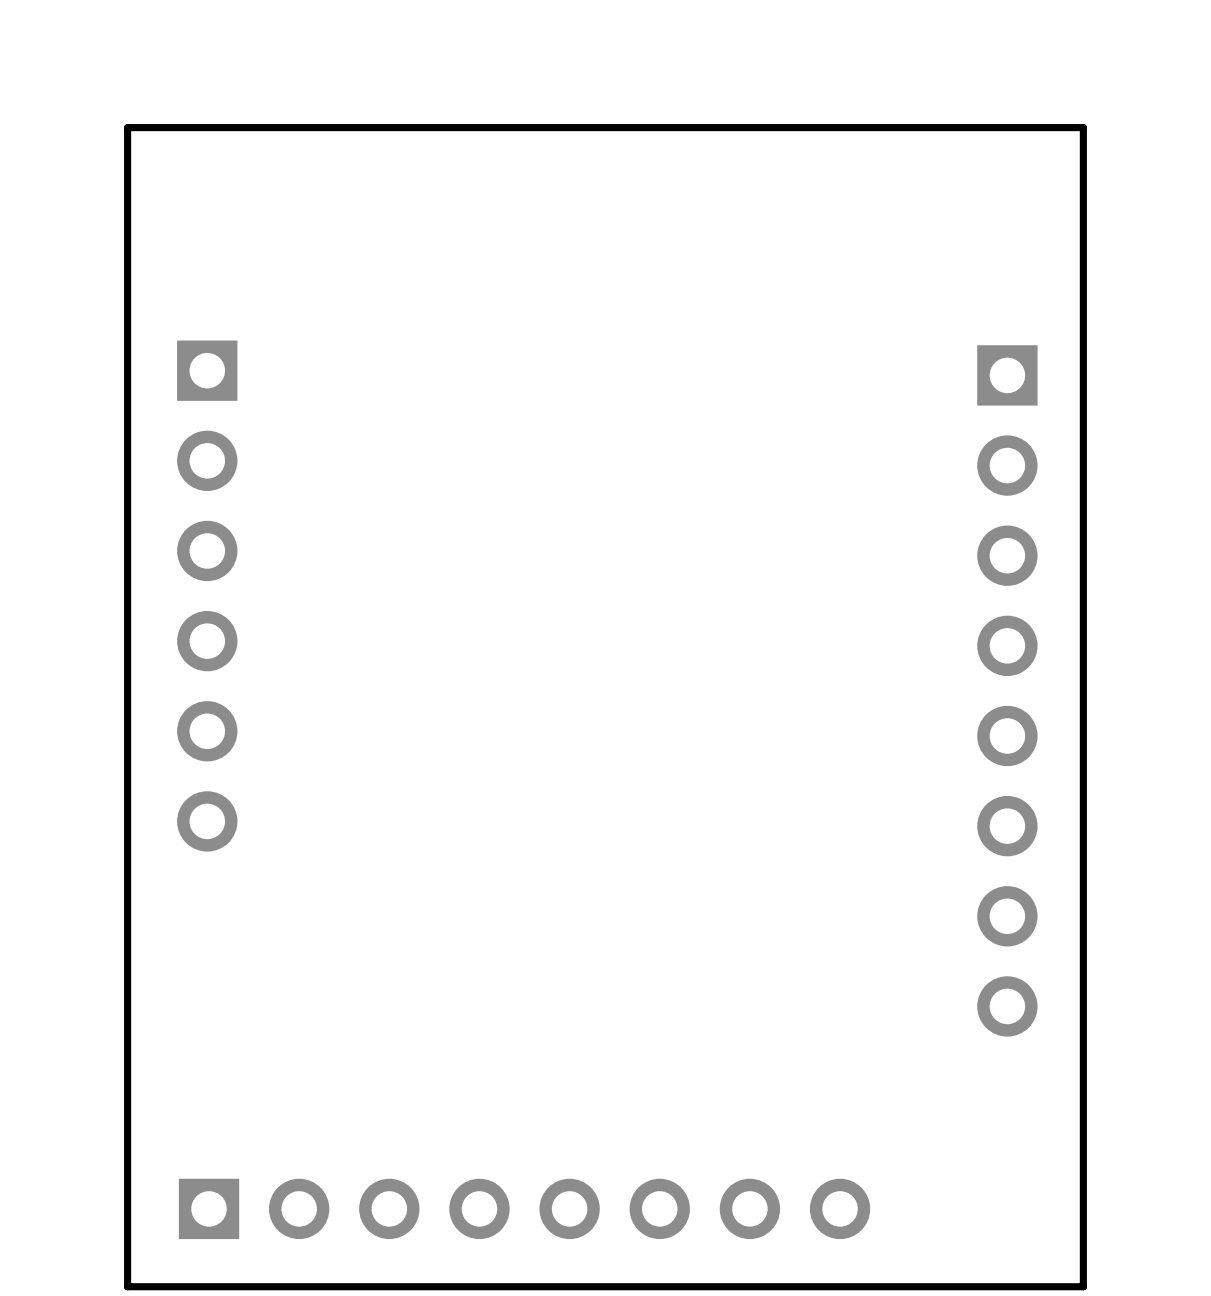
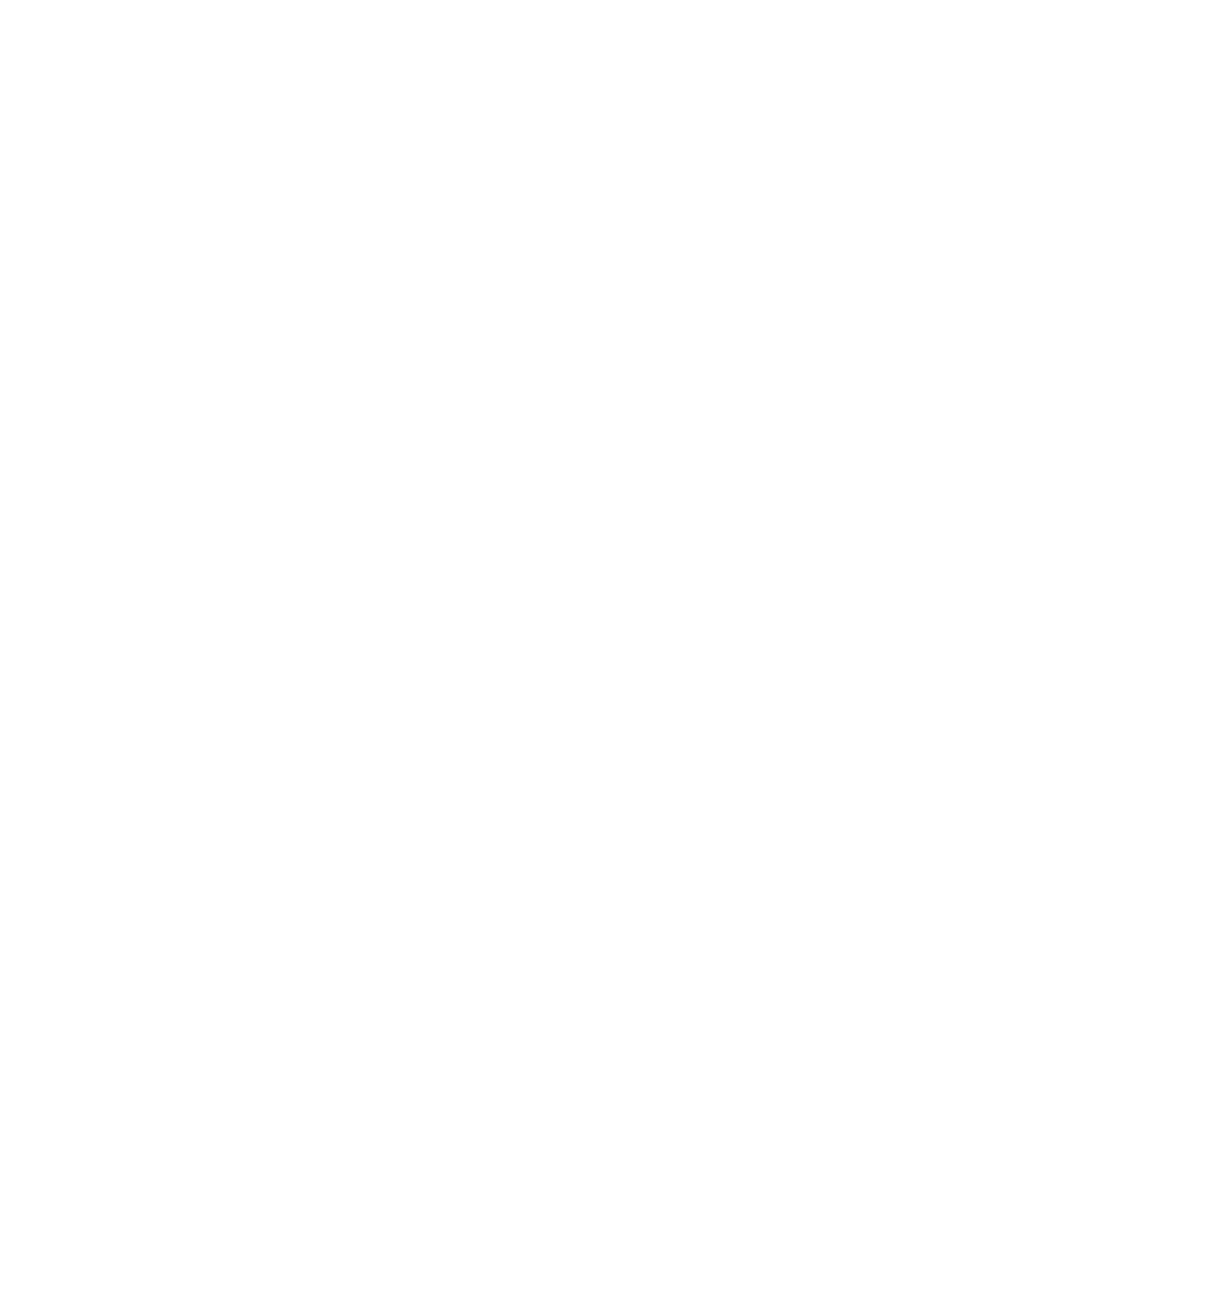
board edge: (1083, 127) (127, 127) (127, 1286) (1083, 1286) (1083, 127) -> none
part: (207, 596) -> none
part: (1007, 690) -> none
part: (524, 1208) -> none

